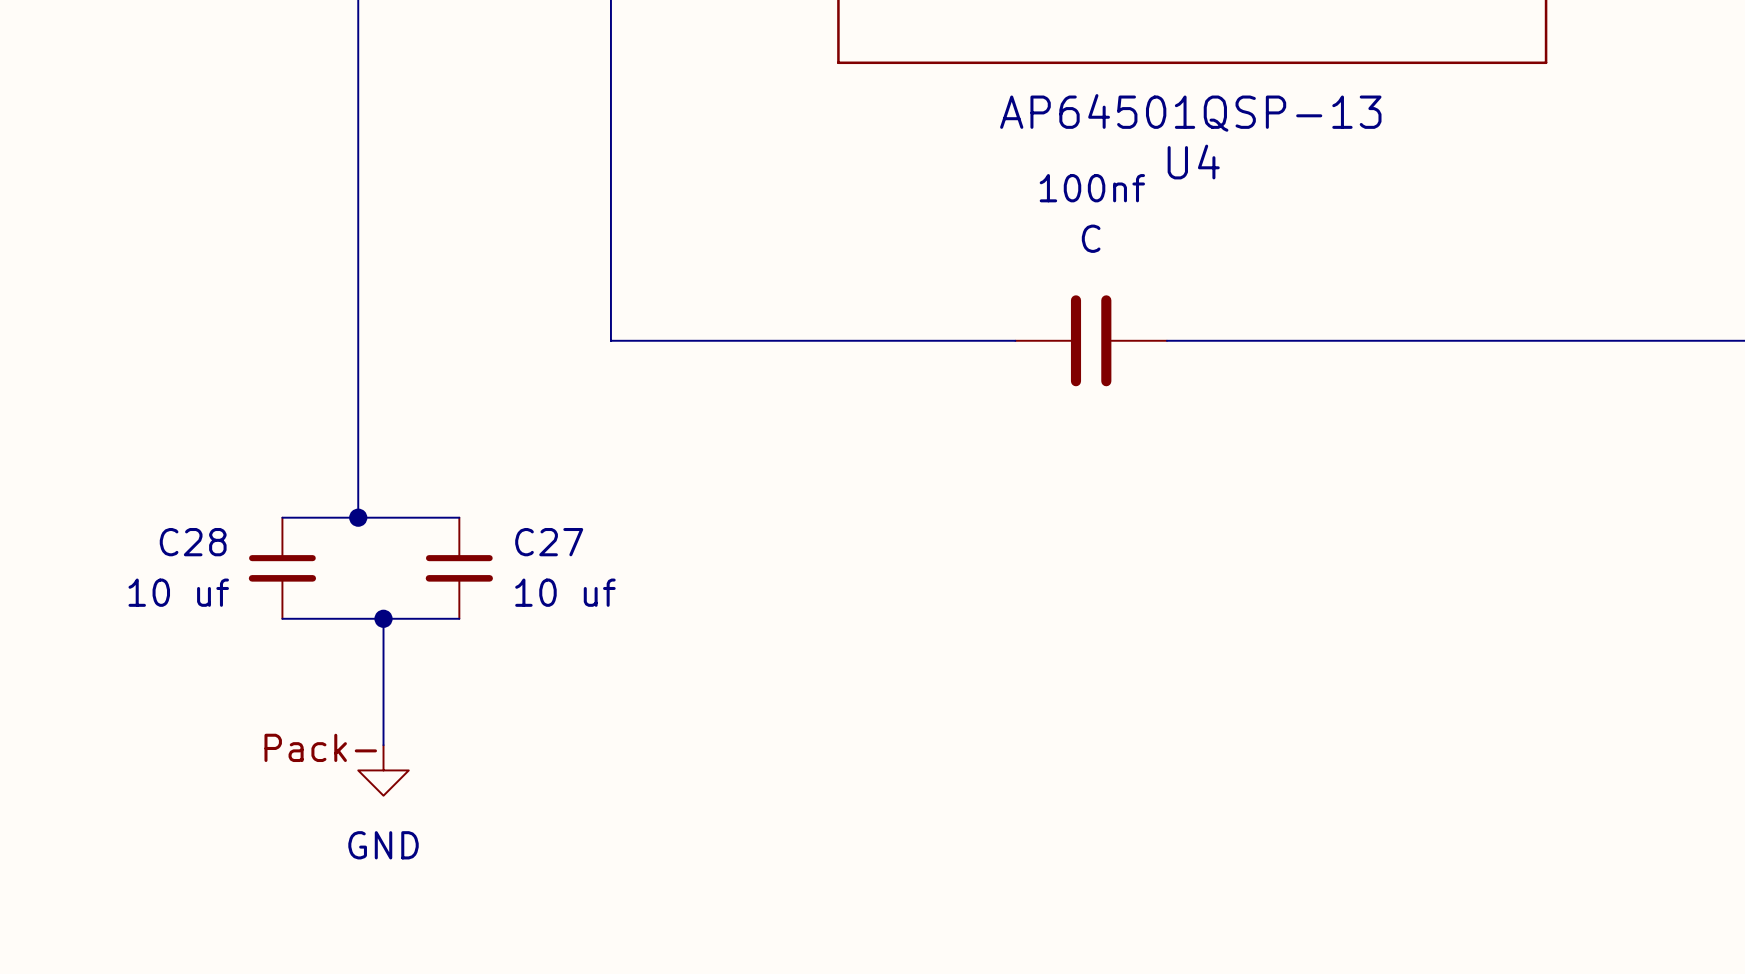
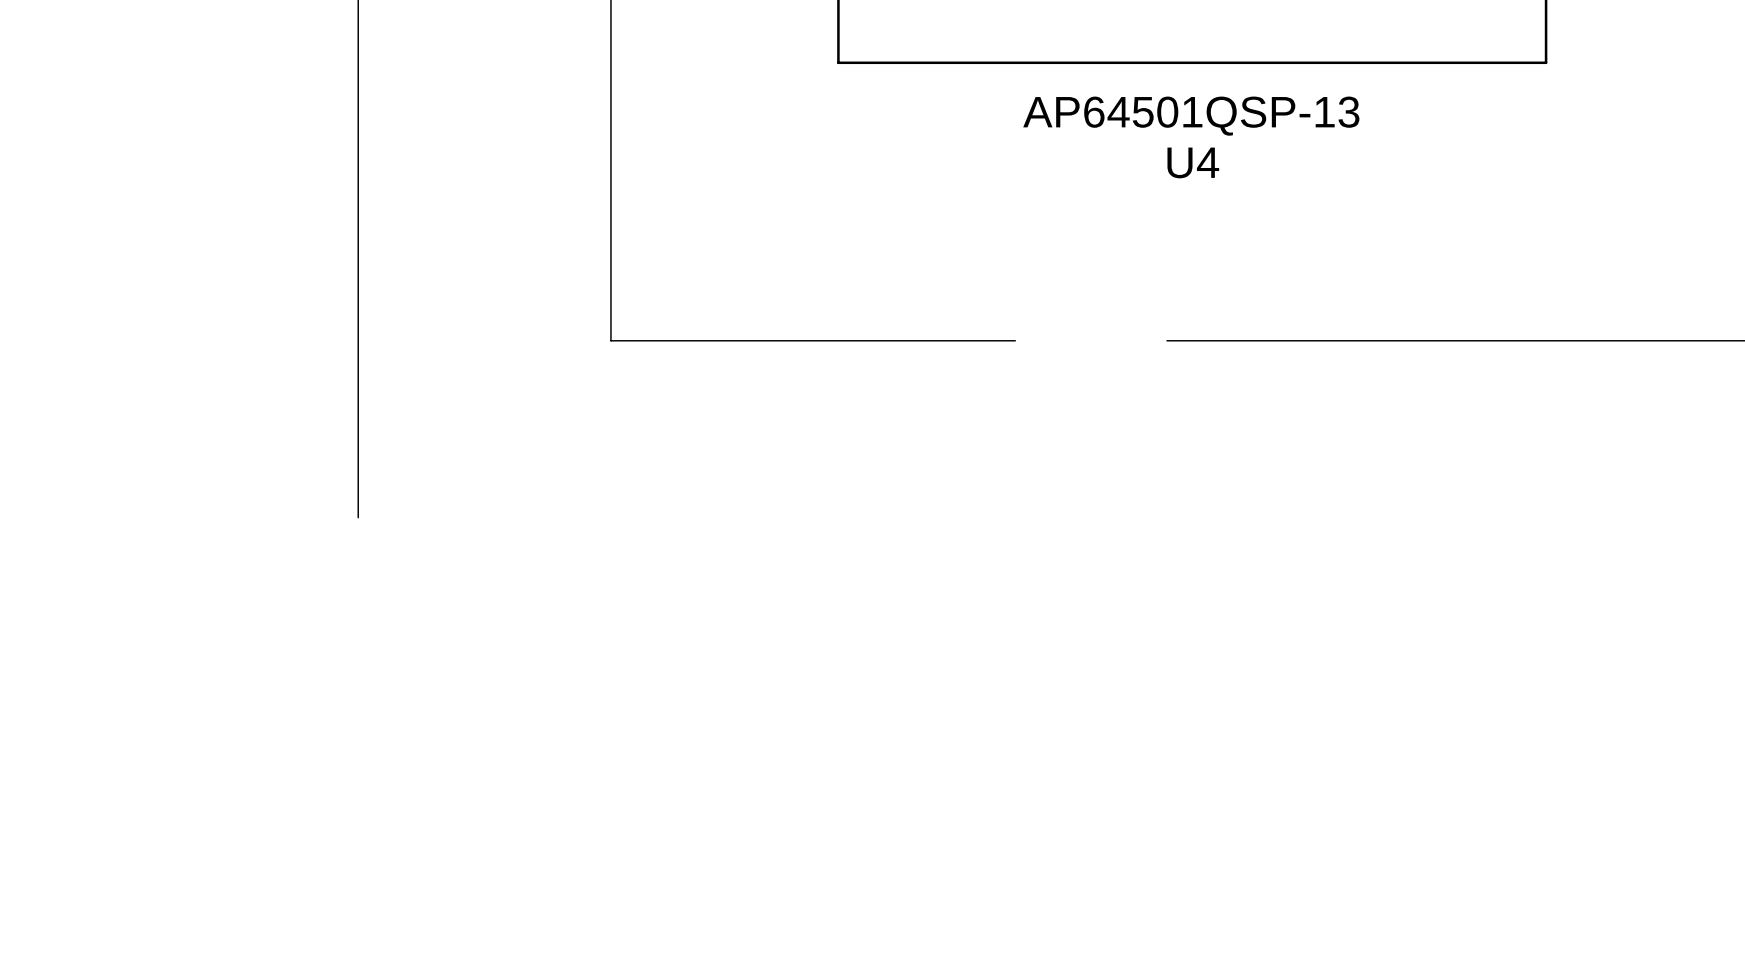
100nf: C (1091, 340) -> none
wire: (282, 517) (459, 517) -> none
junction: (358, 517) -> none
C28: 10 uf (282, 568) -> none
C27: 10 uf (459, 568) -> none
wire: (282, 618) (459, 618) -> none
wire: (383, 618) (383, 745) -> none
junction: (383, 618) -> none
label: Pack- (320, 747) -> none
power symbol: GND (383, 770) -> none

